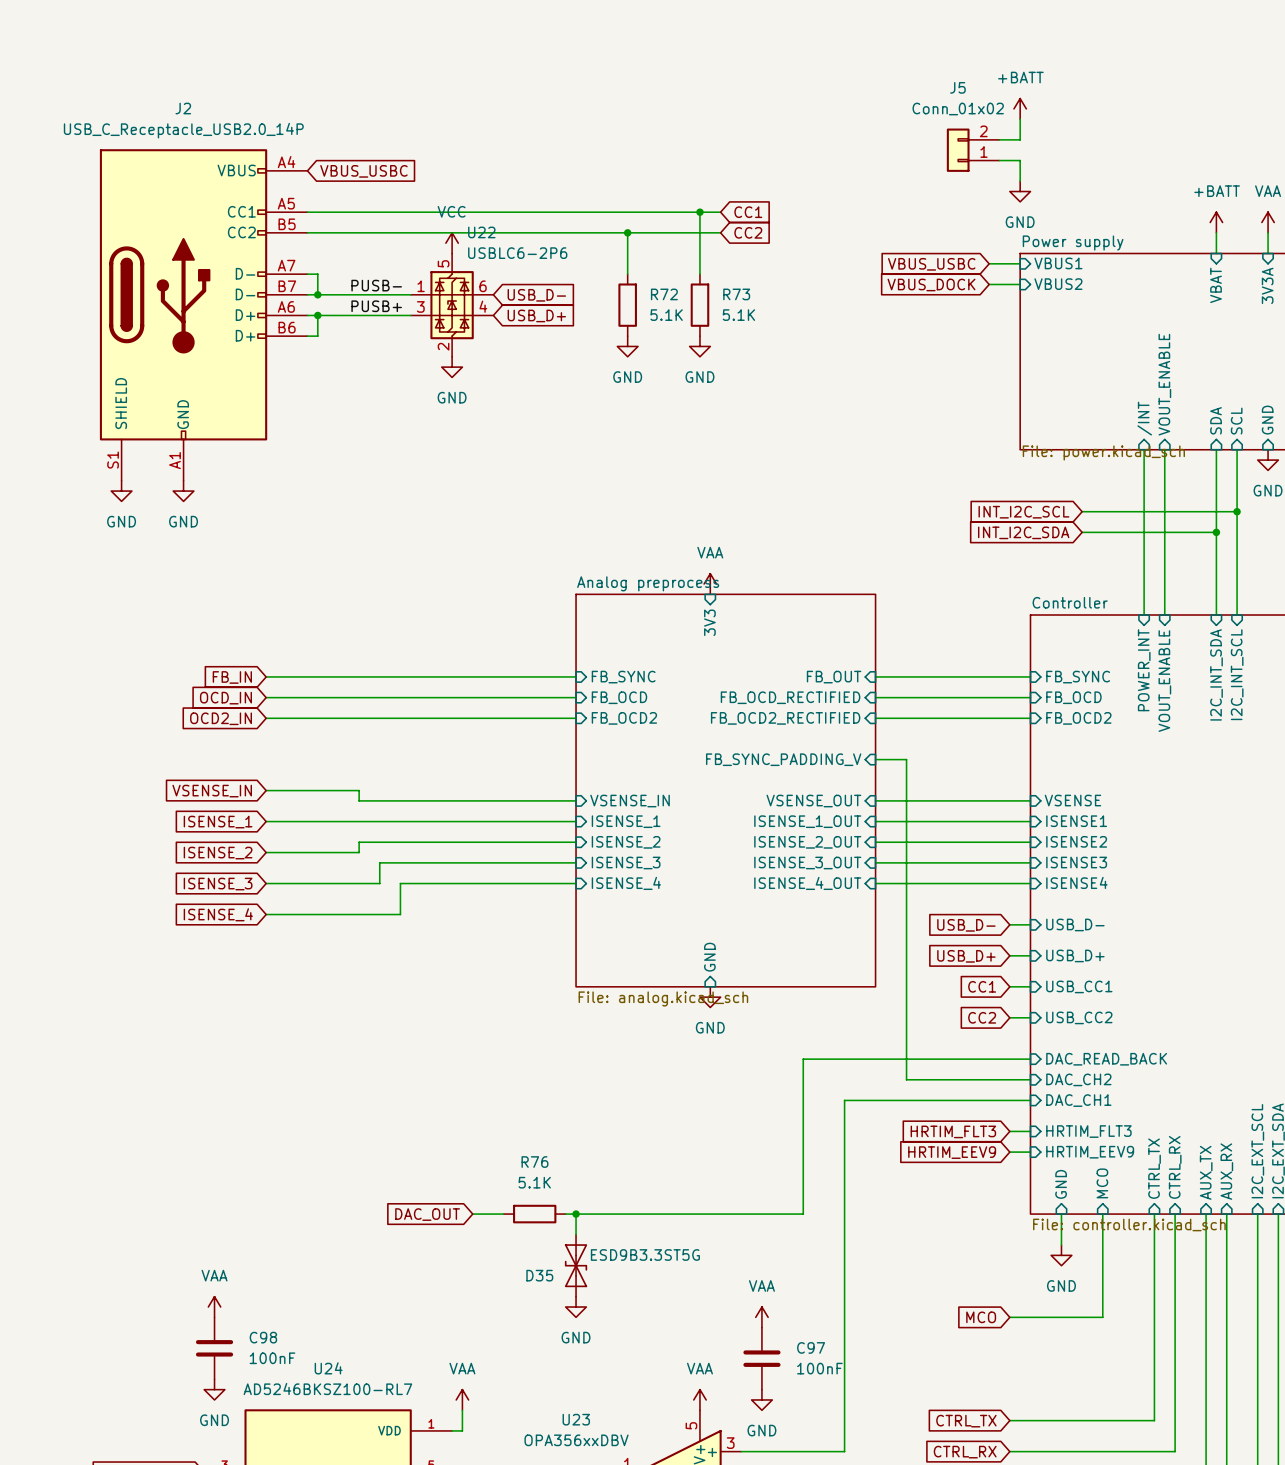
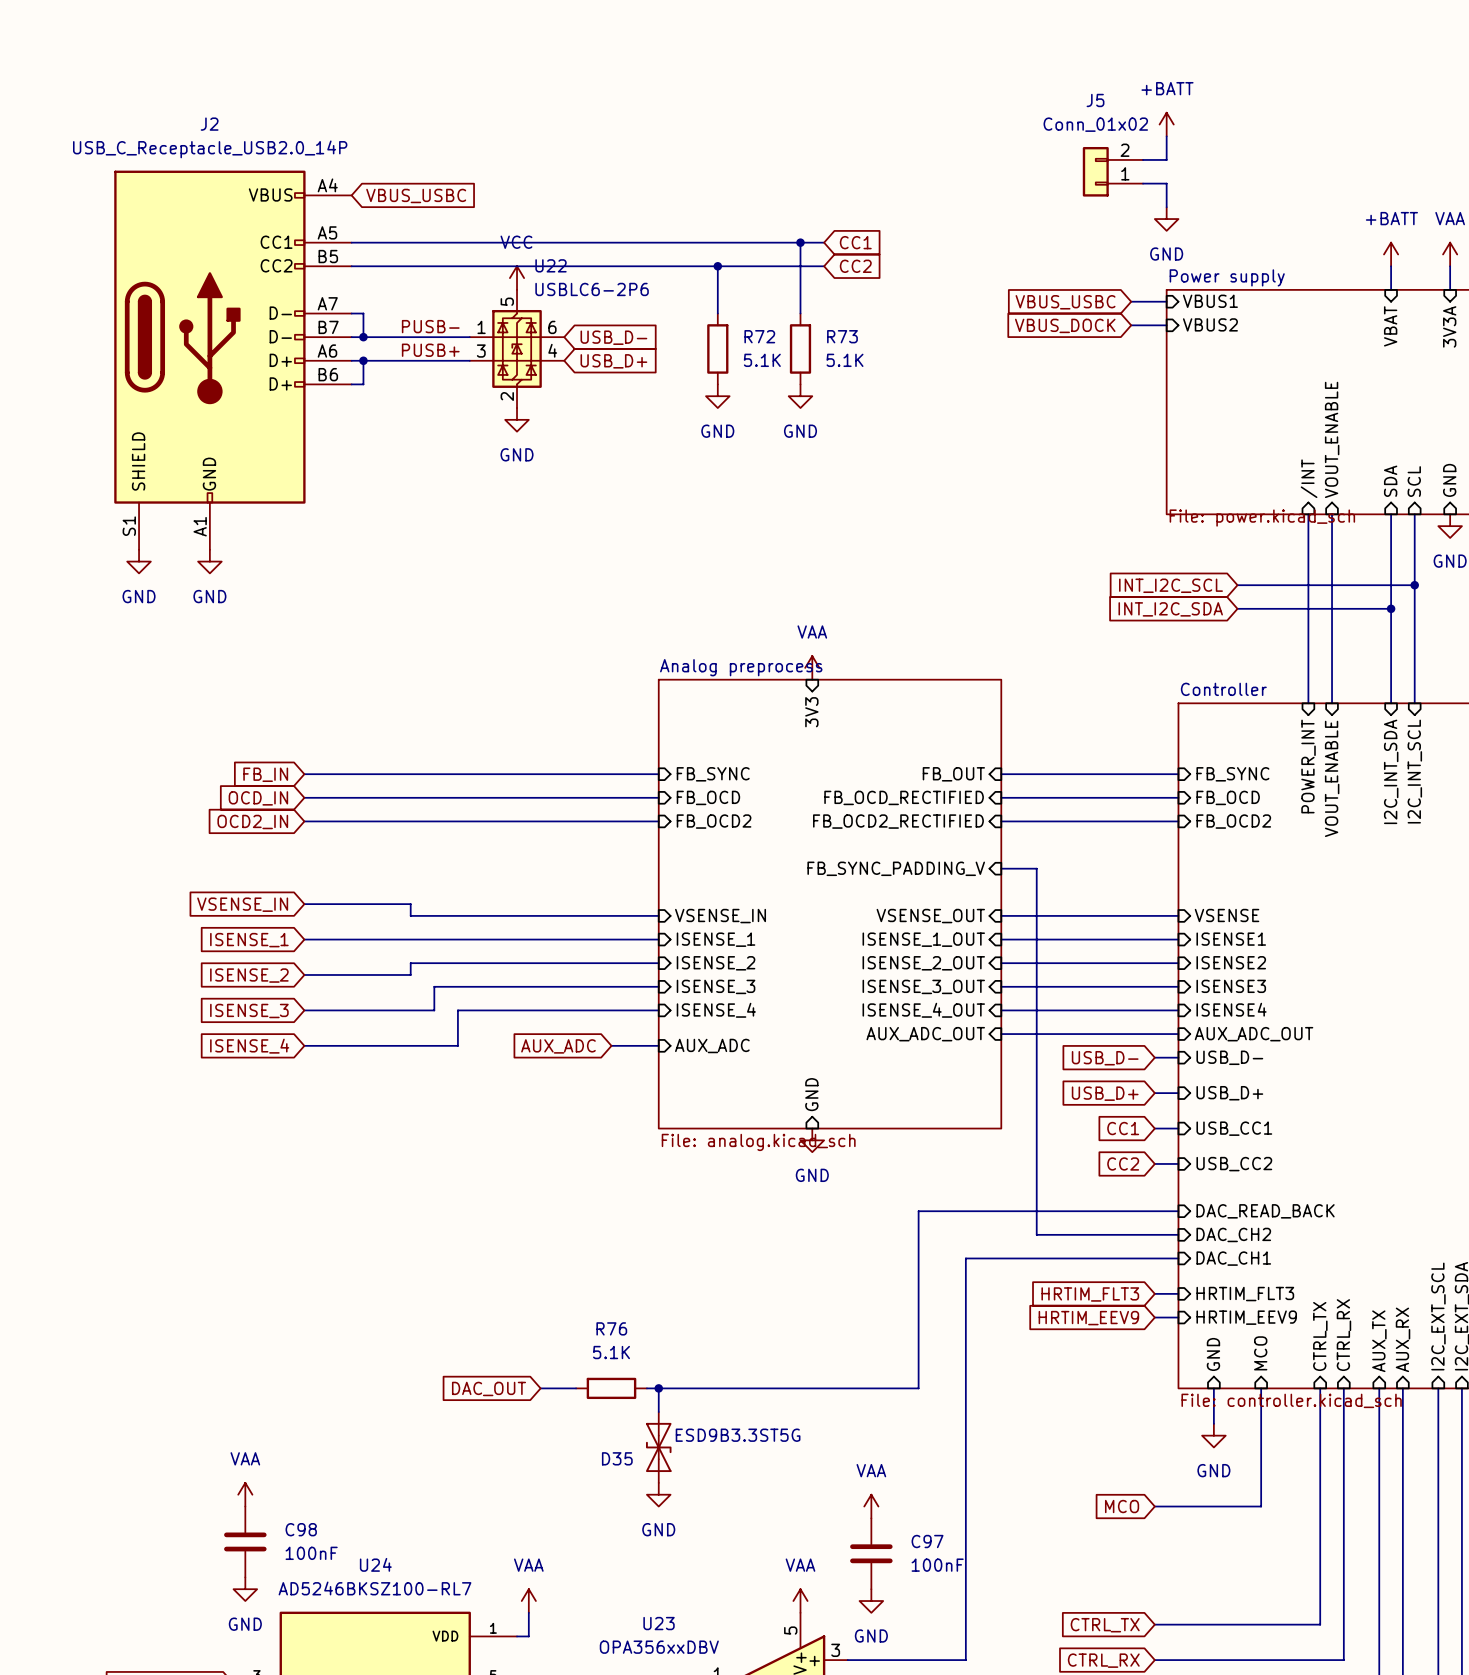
sheet pin: none -> AUX_ADC_OUT (925, 1034)
wire: none -> (1001, 1034) (1178, 1034)
sheet pin: none -> AUX_ADC_OUT (1254, 1034)
wire: none -> (611, 1045) (658, 1045)
sheet pin: none -> AUX_ADC (712, 1045)
global label: none -> AUX_ADC (558, 1046)

